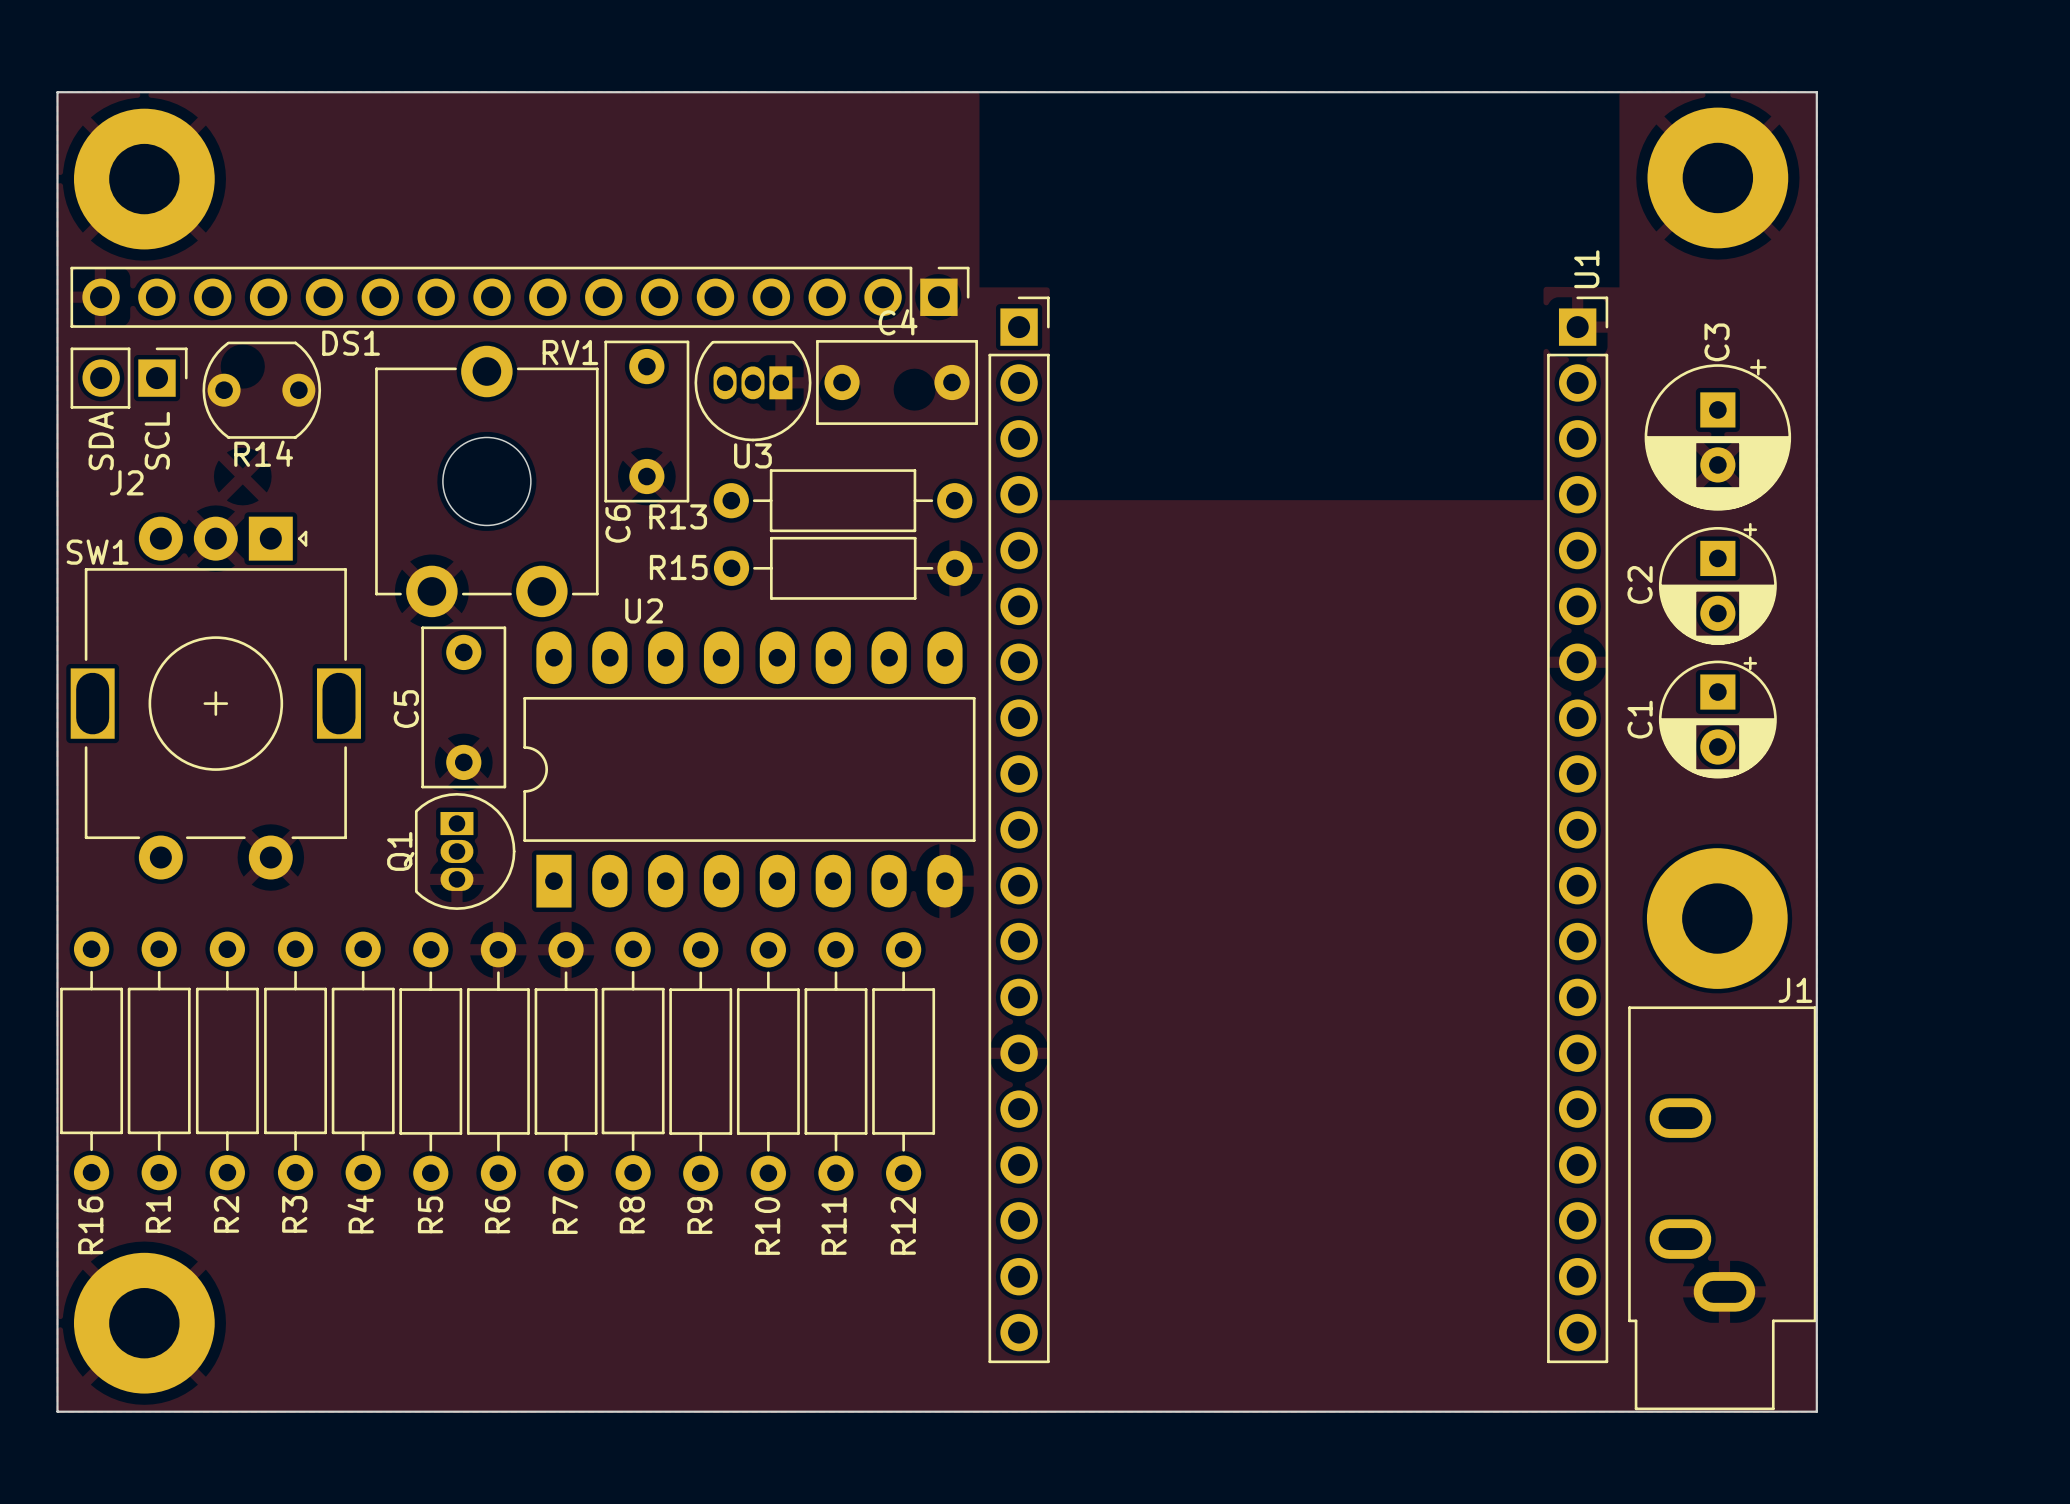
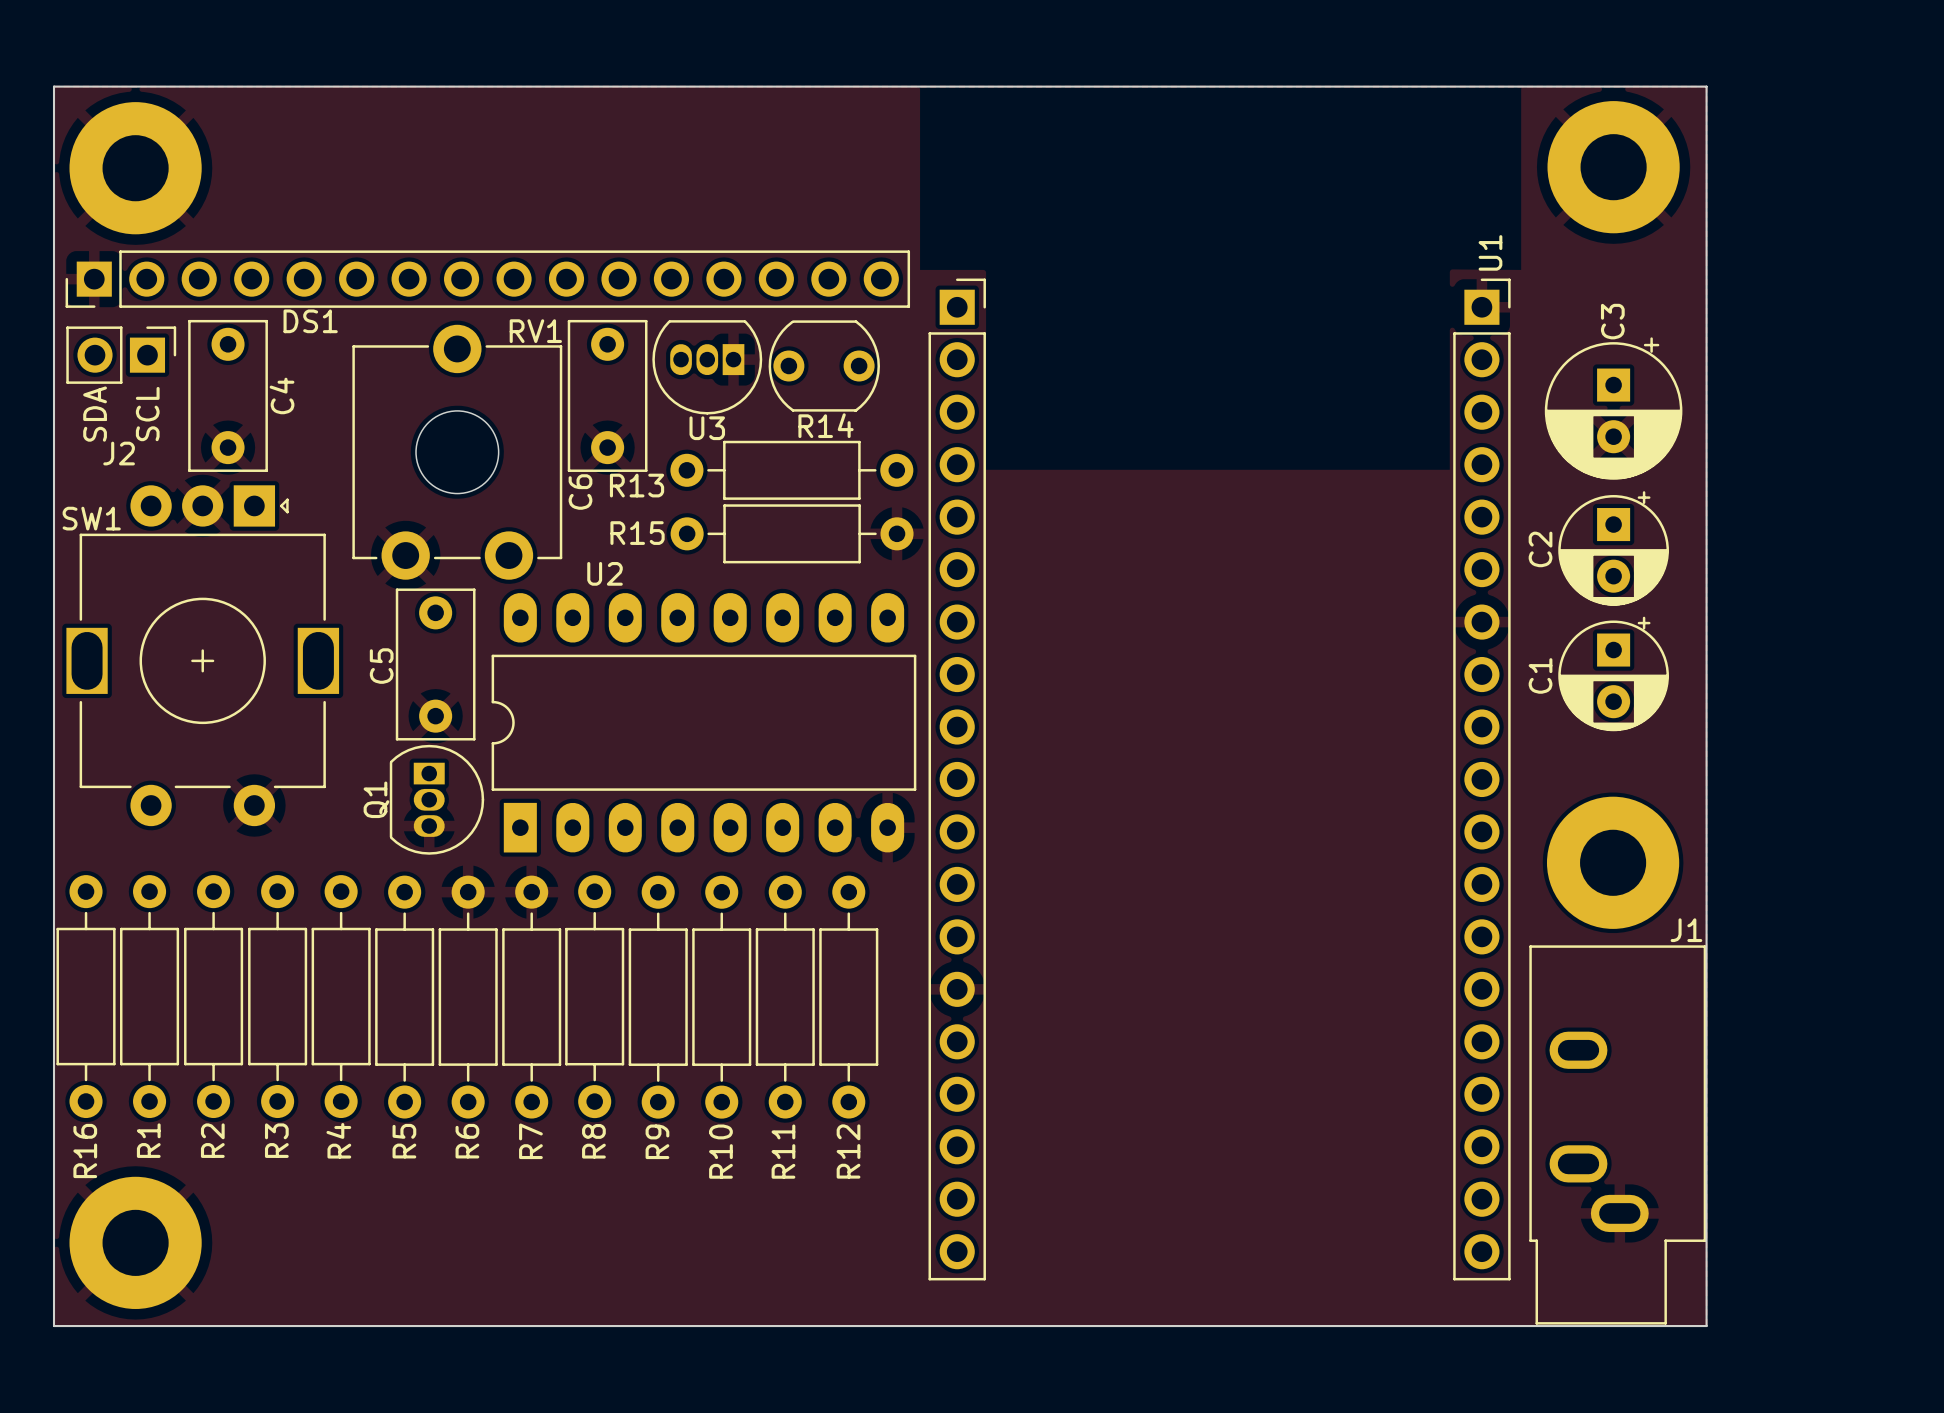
DS1 rotation: 0° (519, 297) -> 180° (487, 279)
C4 rotation: 0° (897, 382) -> 90° clockwise (228, 395)
C4 position: (897, 382) -> (228, 395)
R14 position: (261, 390) -> (824, 366)

